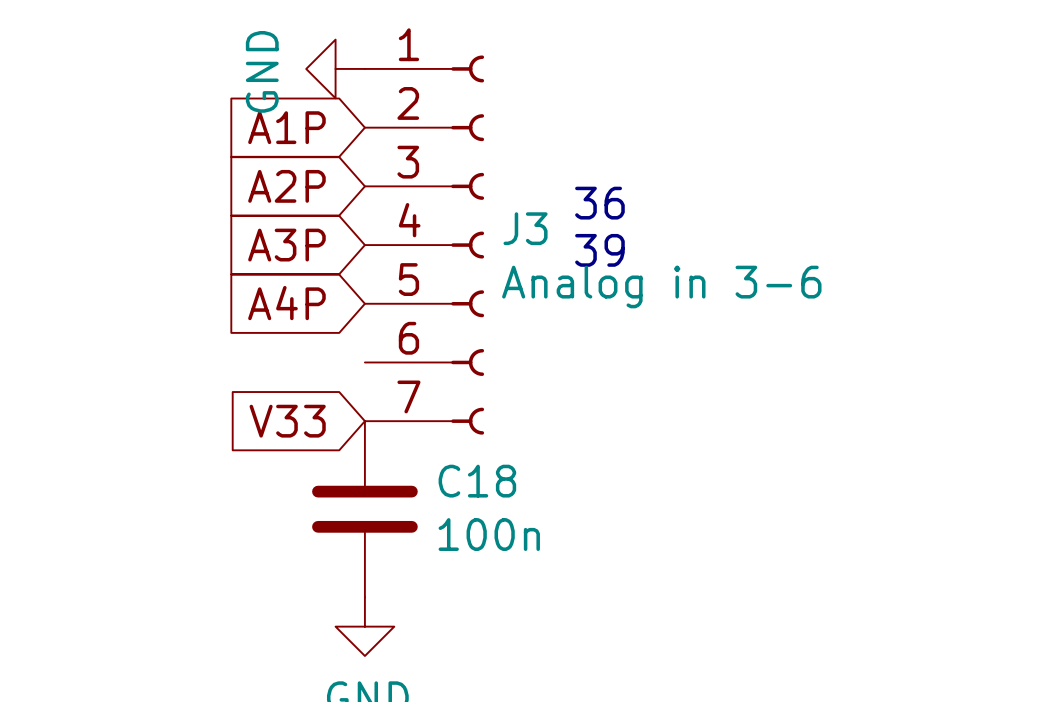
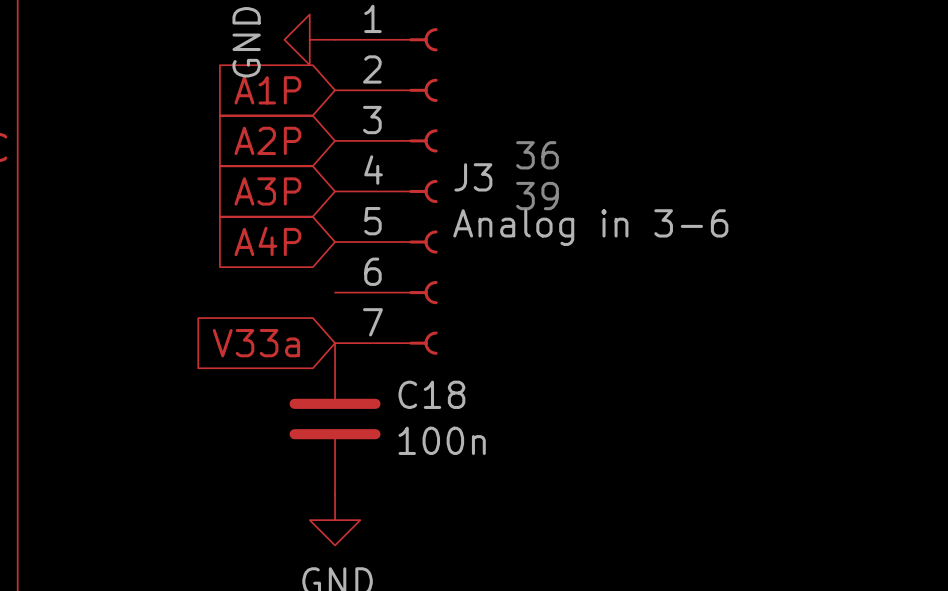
global label: V33 (287, 421) -> V33a (256, 343)

